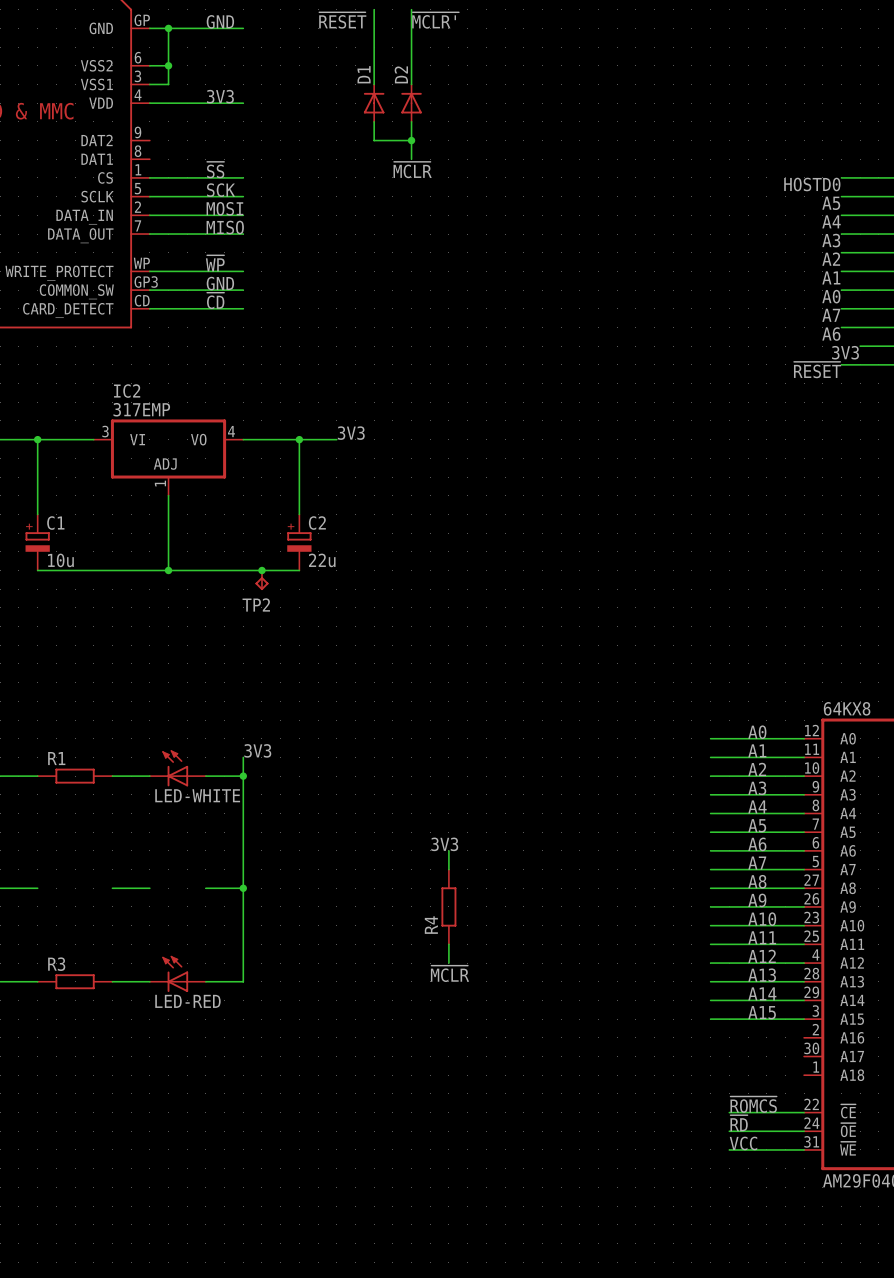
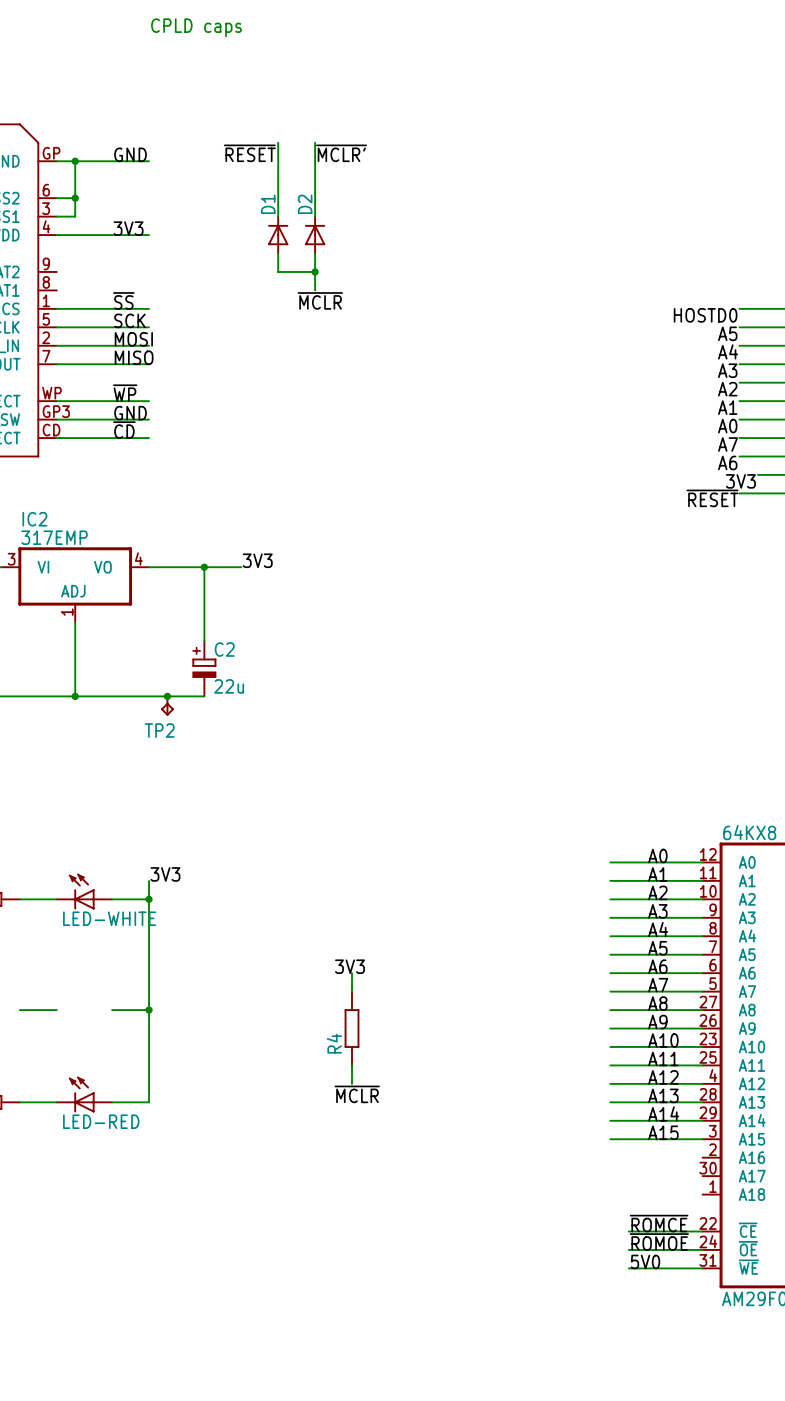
label: ~{ROMCS} (753, 1104) -> ~{ROMCE} (659, 1223)
label: ~{RD} (739, 1123) -> ~{ROMOE} (659, 1242)
label: VCC (743, 1143) -> 5V0 (645, 1261)

